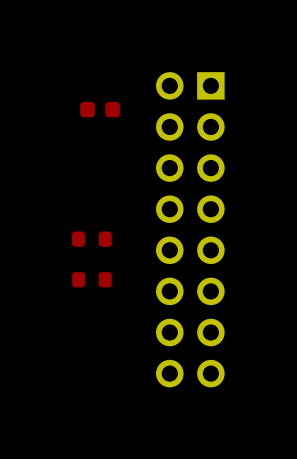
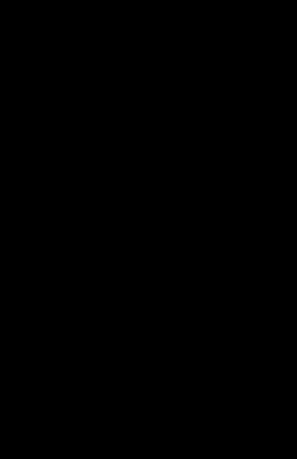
part: (100, 109) -> none
part: (190, 229) -> none
part: (91, 239) -> none
part: (91, 279) -> none

